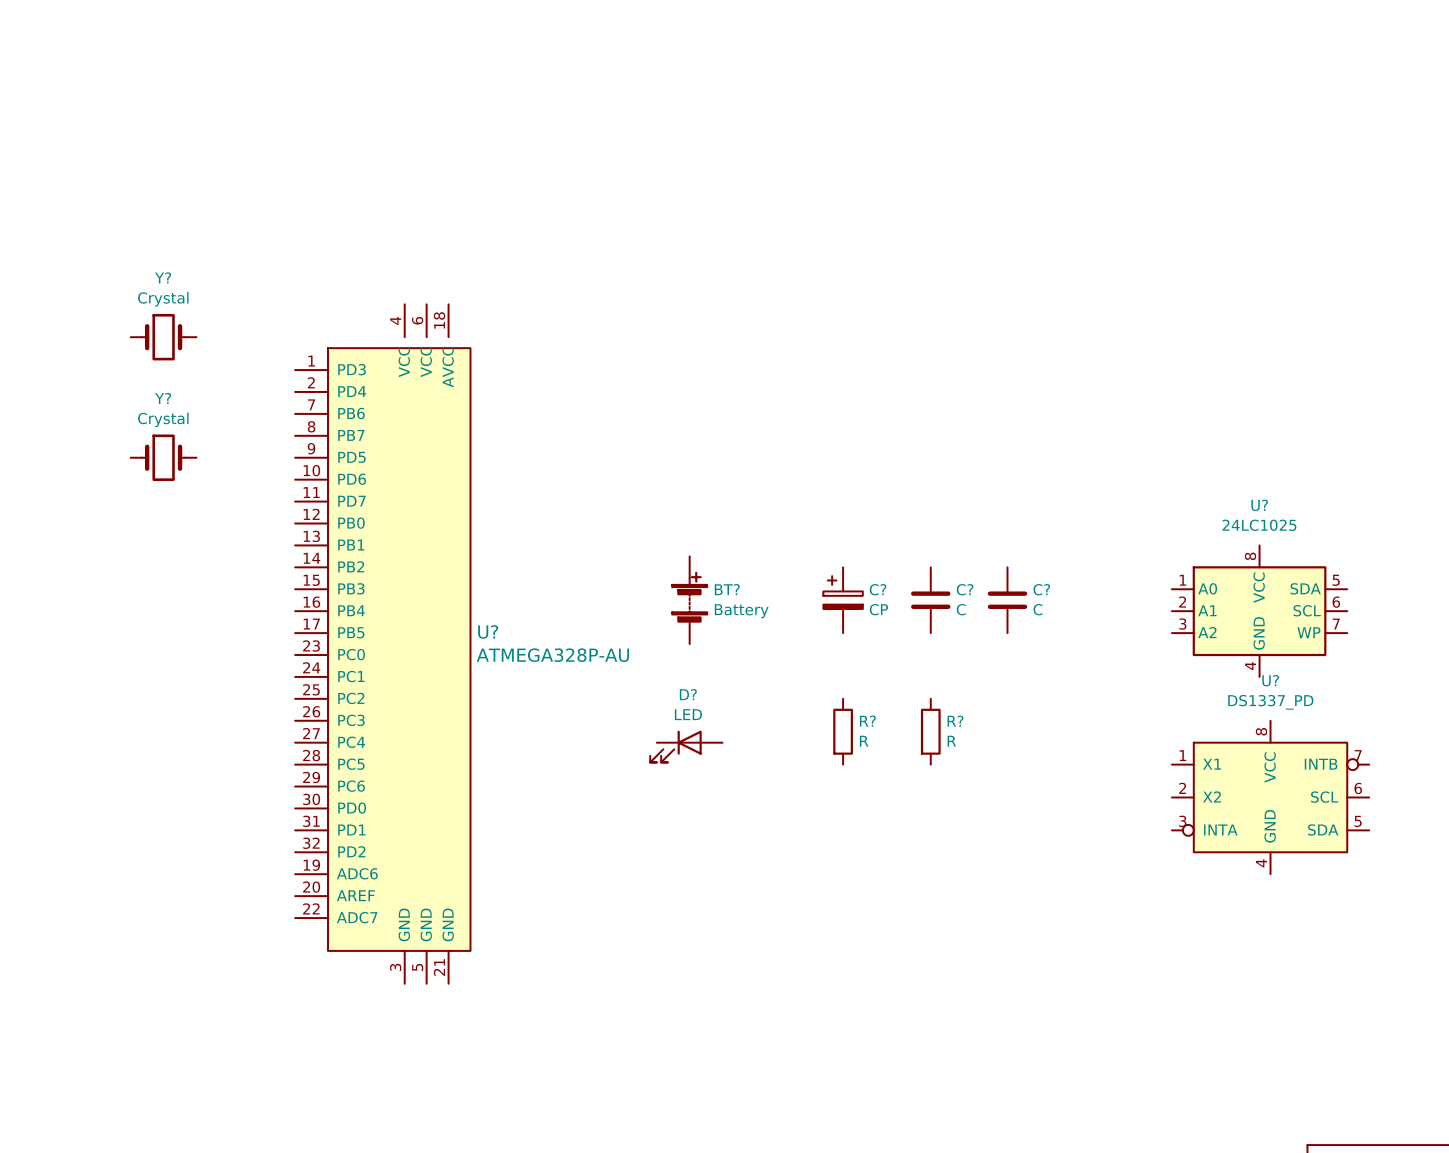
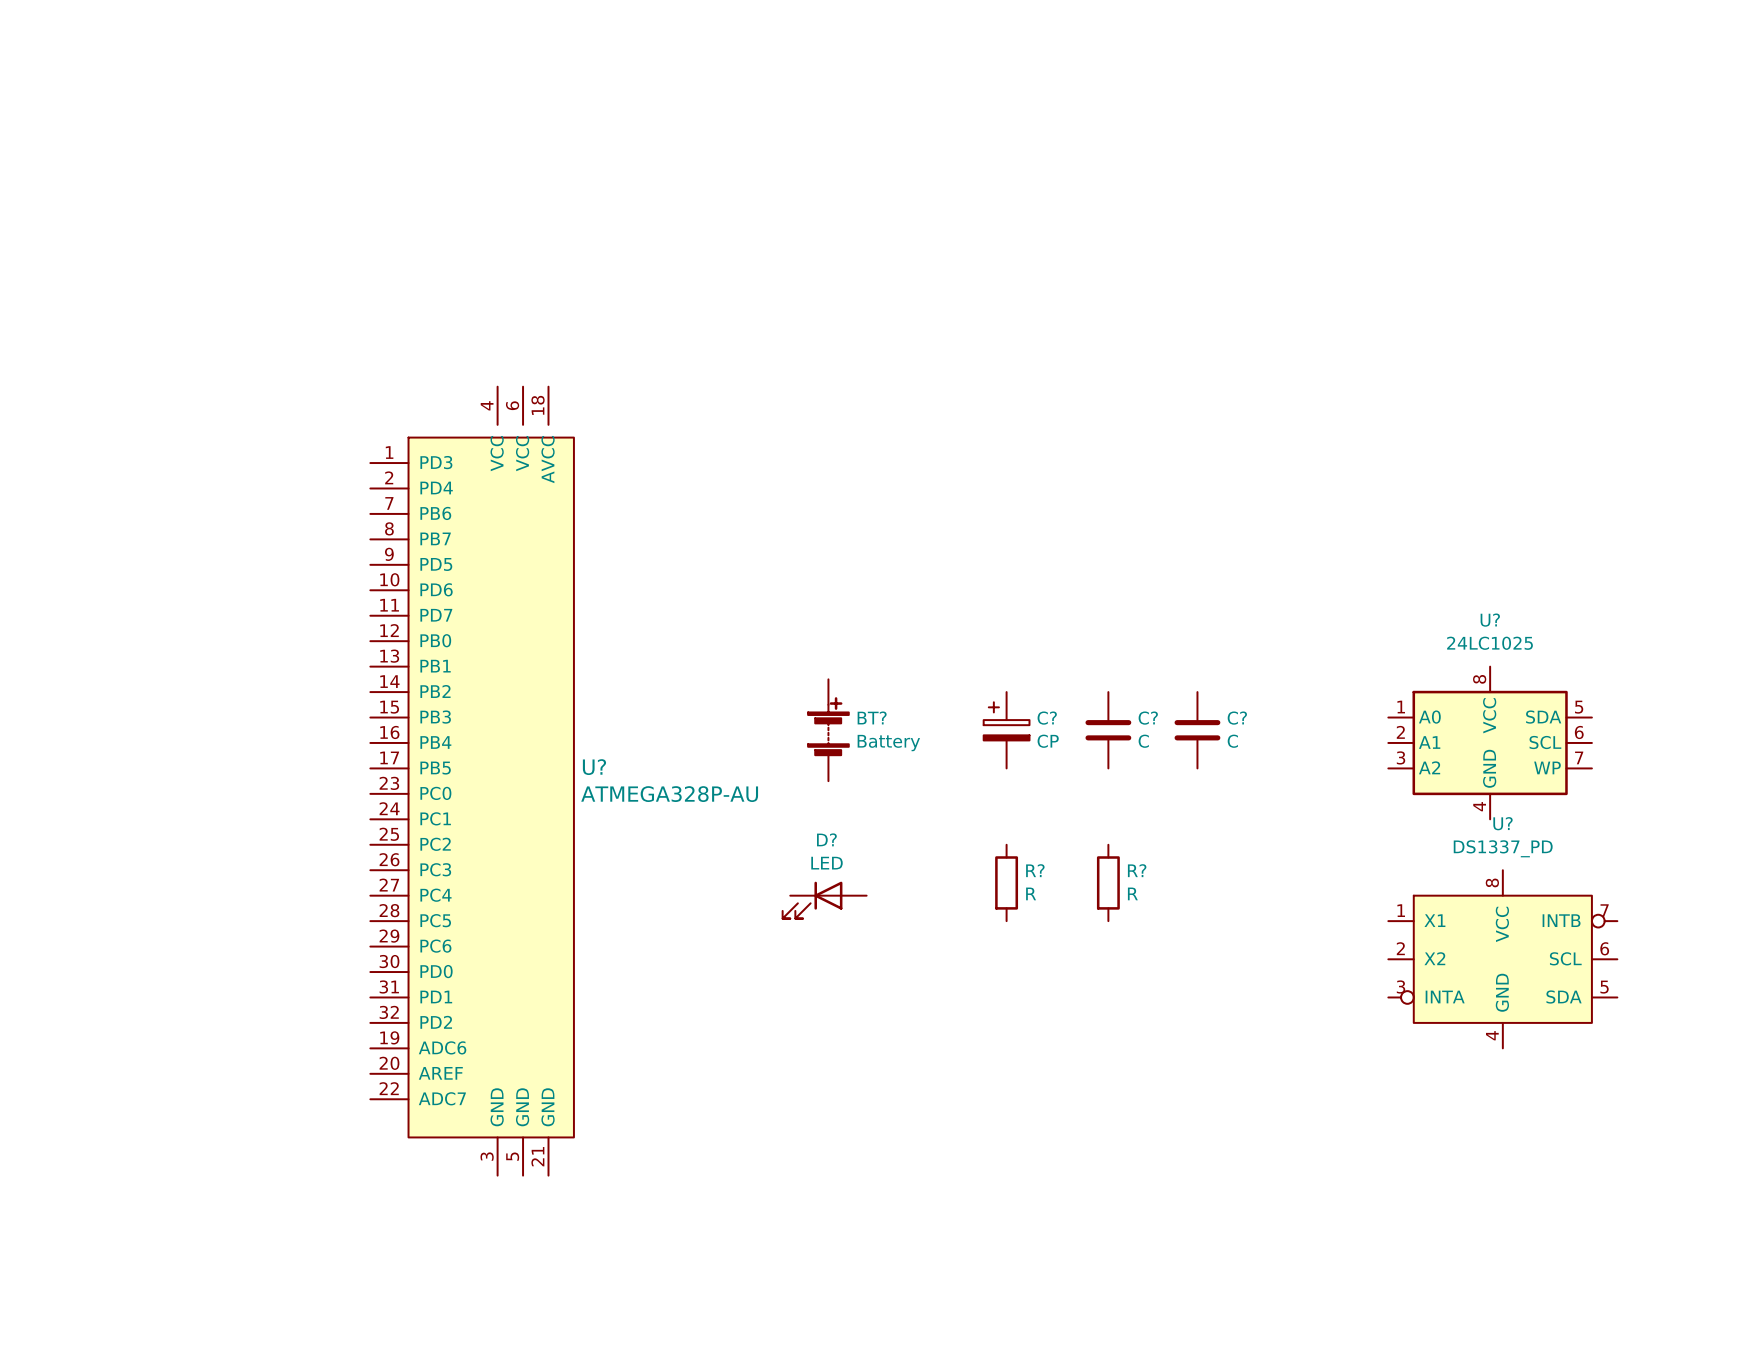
Y?: Crystal (163, 337) -> none
Y?: Crystal (163, 457) -> none

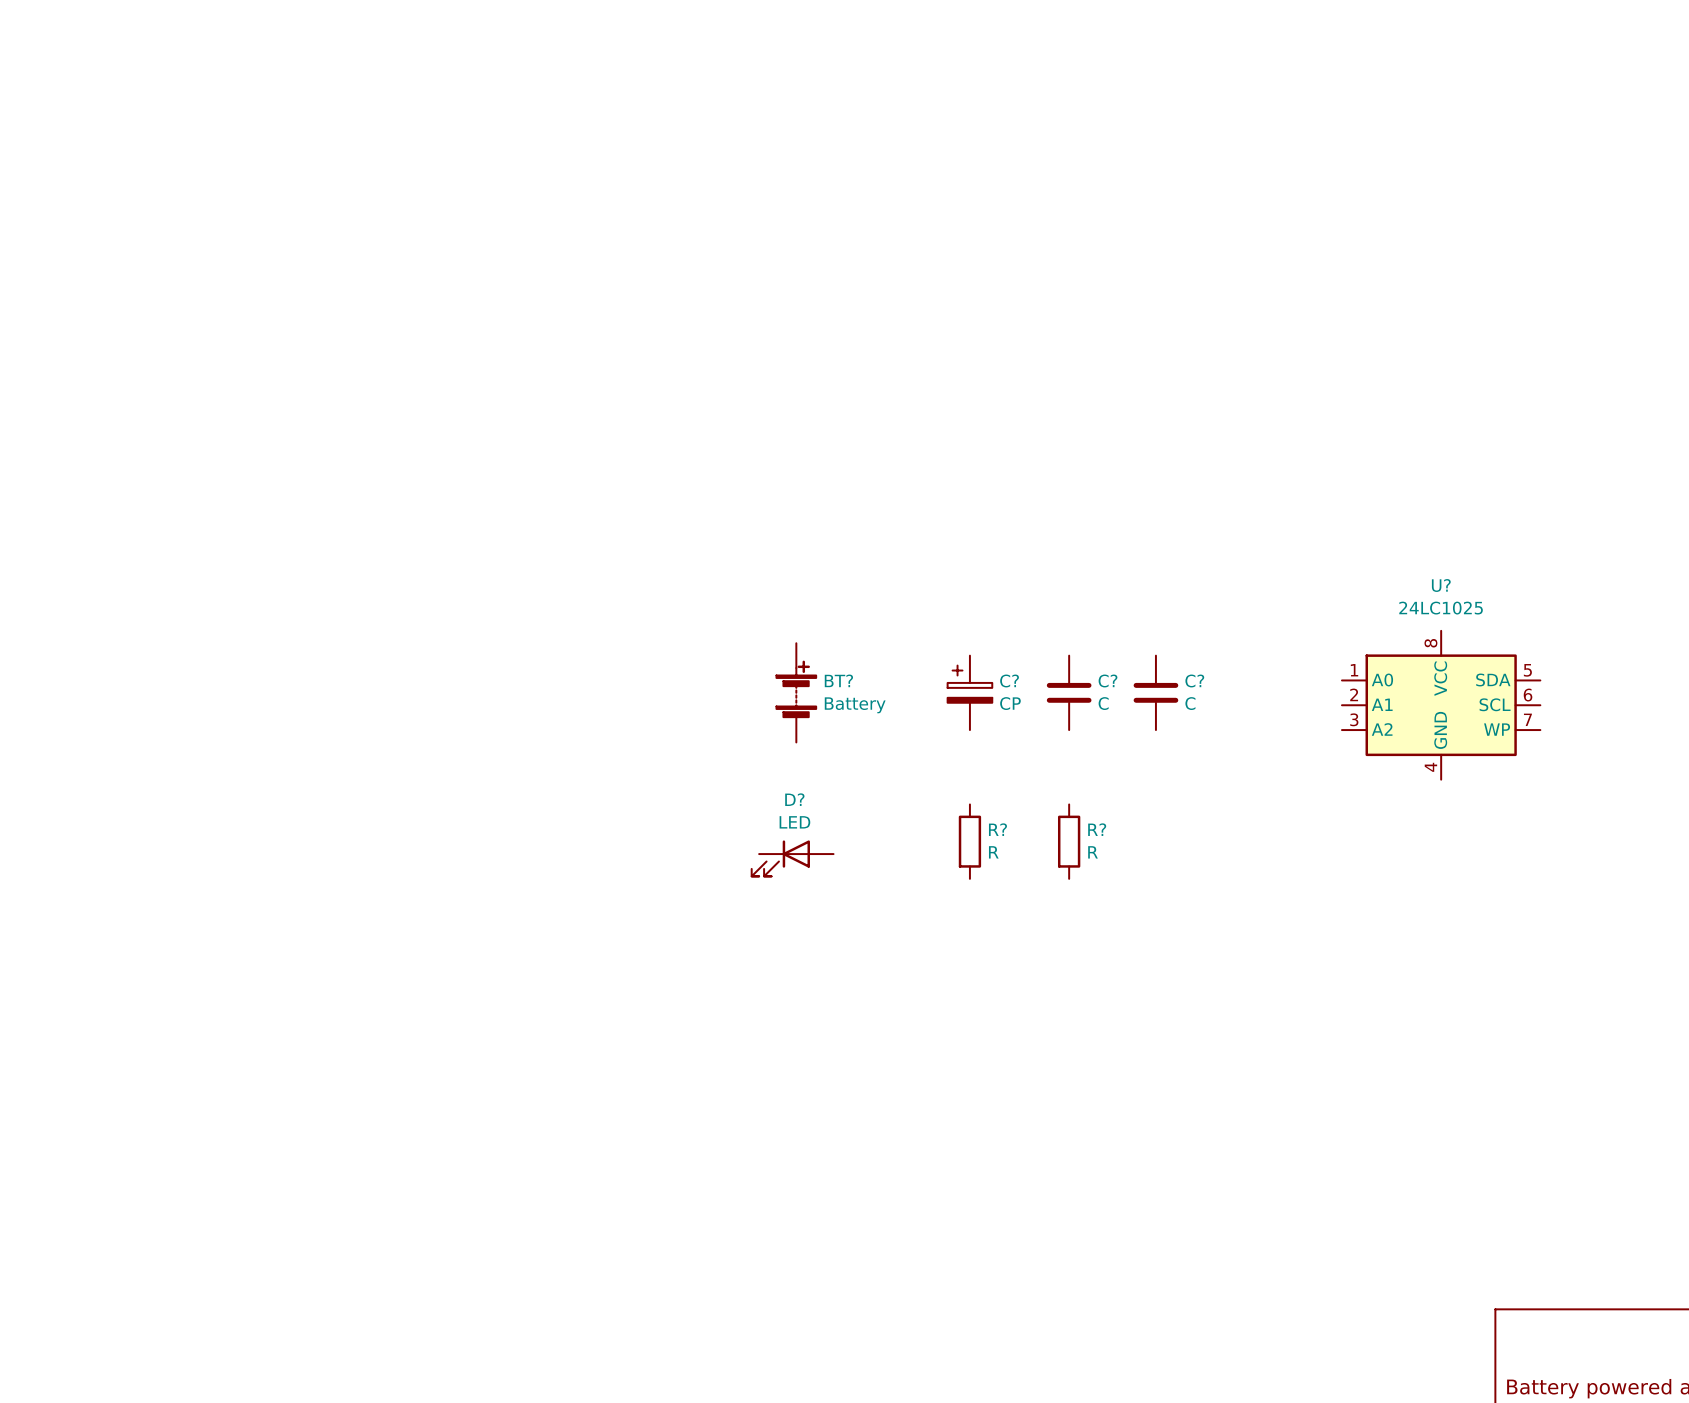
U?: ATMEGA328P-AU (472, 781) -> none
U?: DS1337_PD (1502, 959) -> none

